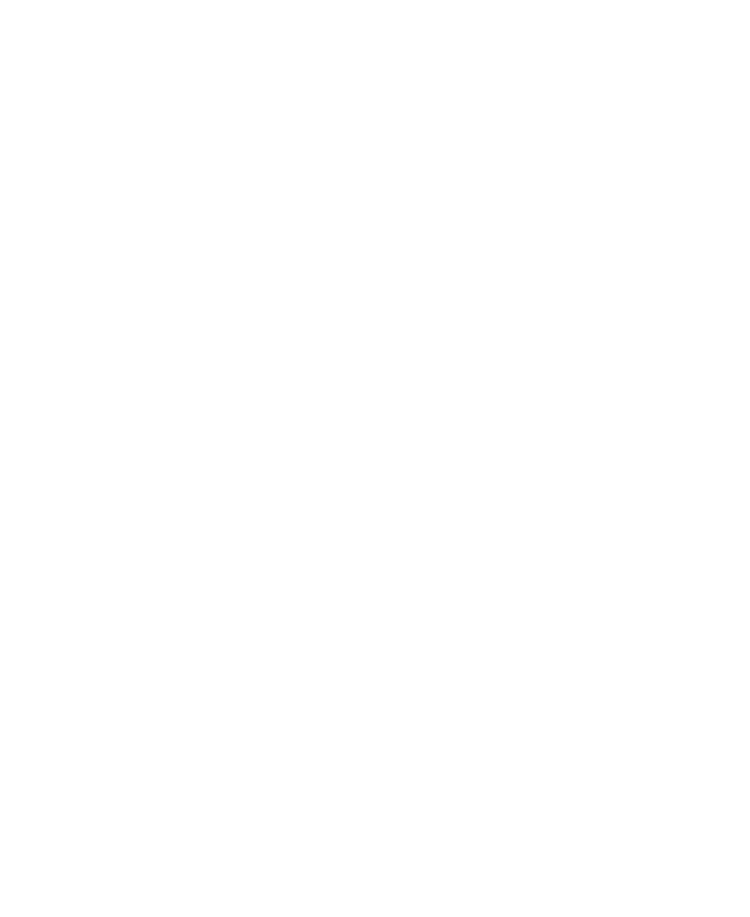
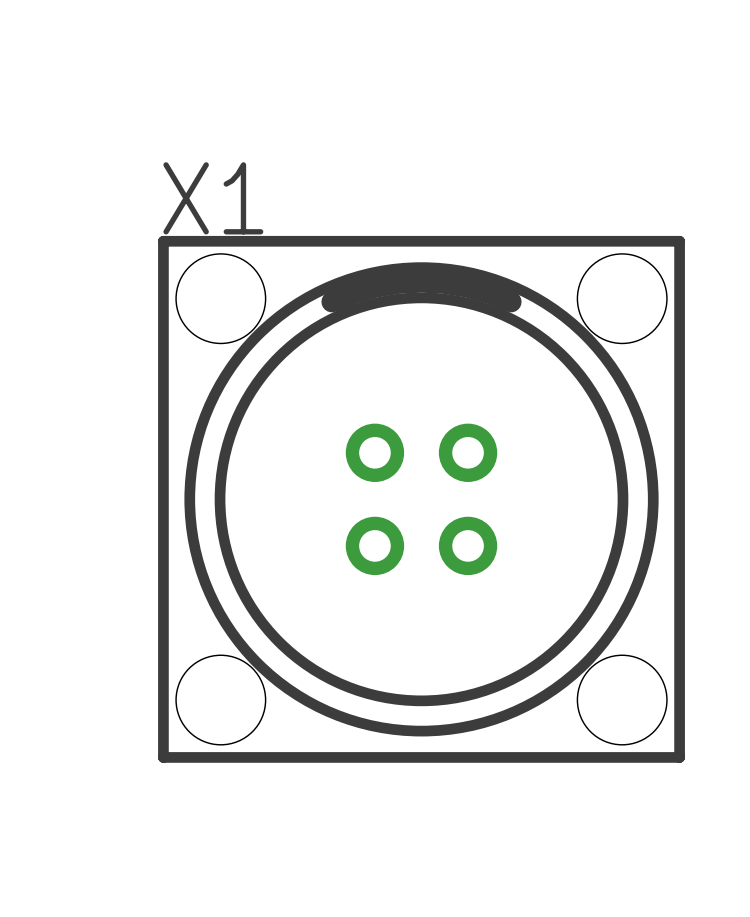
X1: none -> (421, 499)

